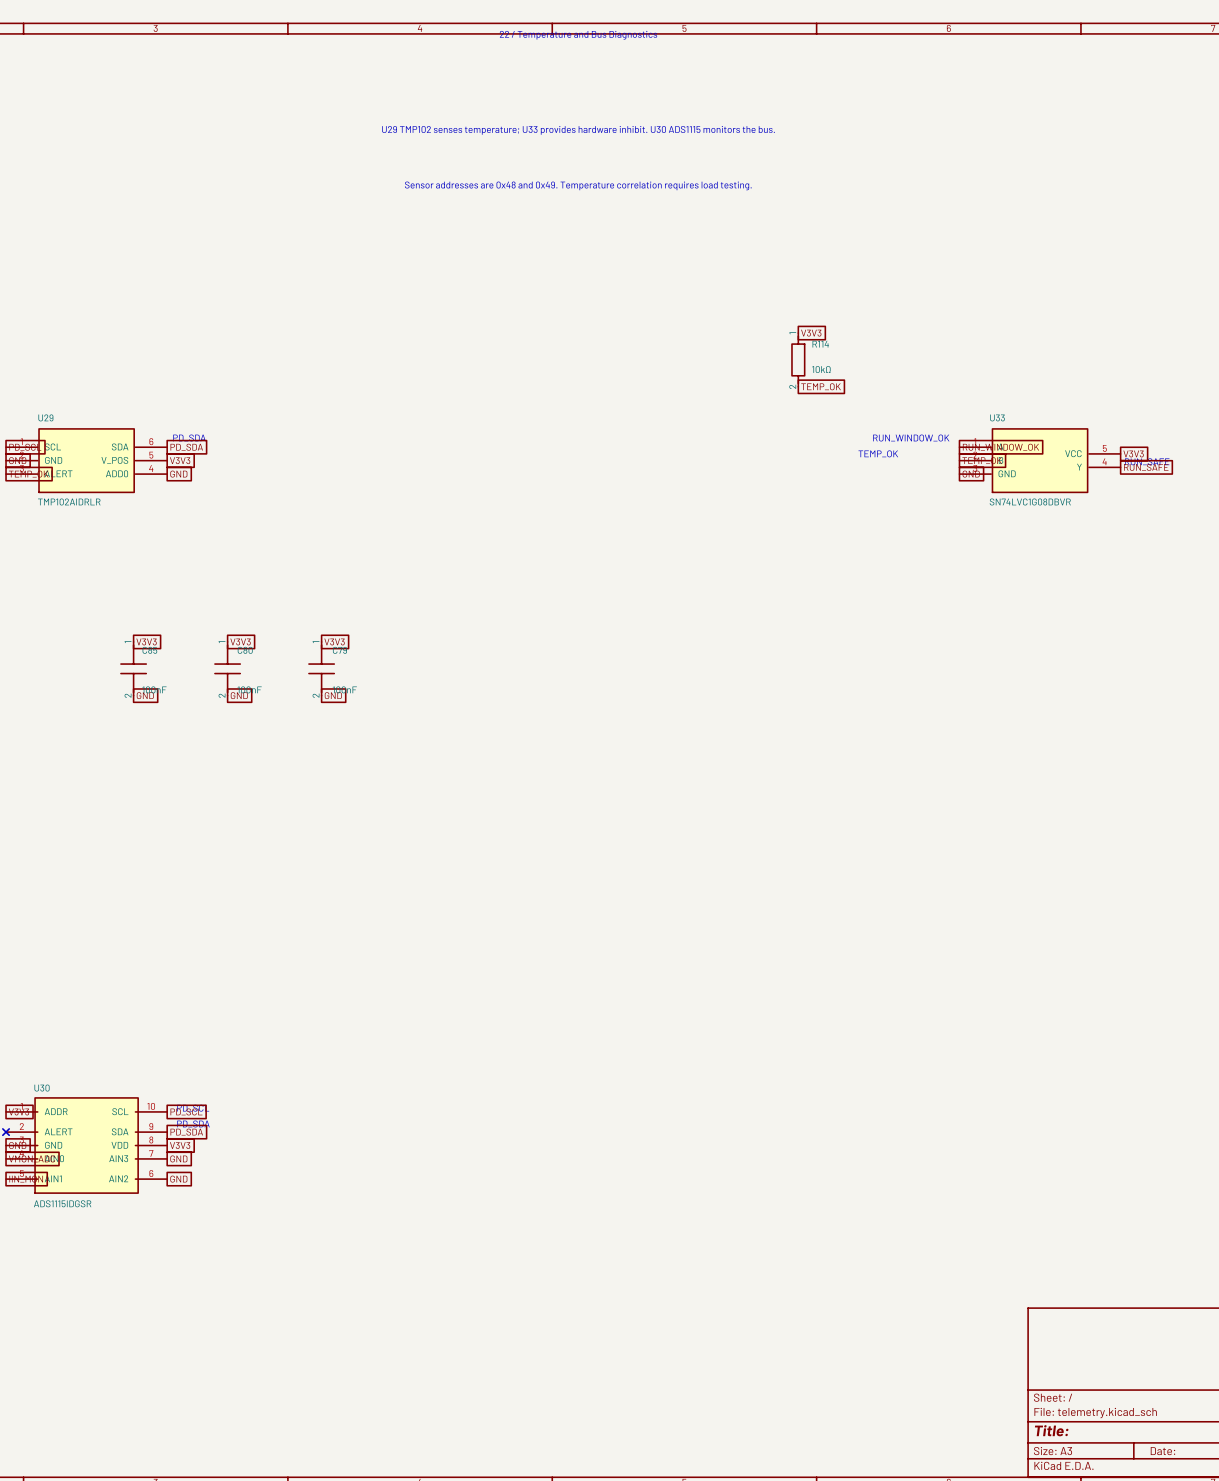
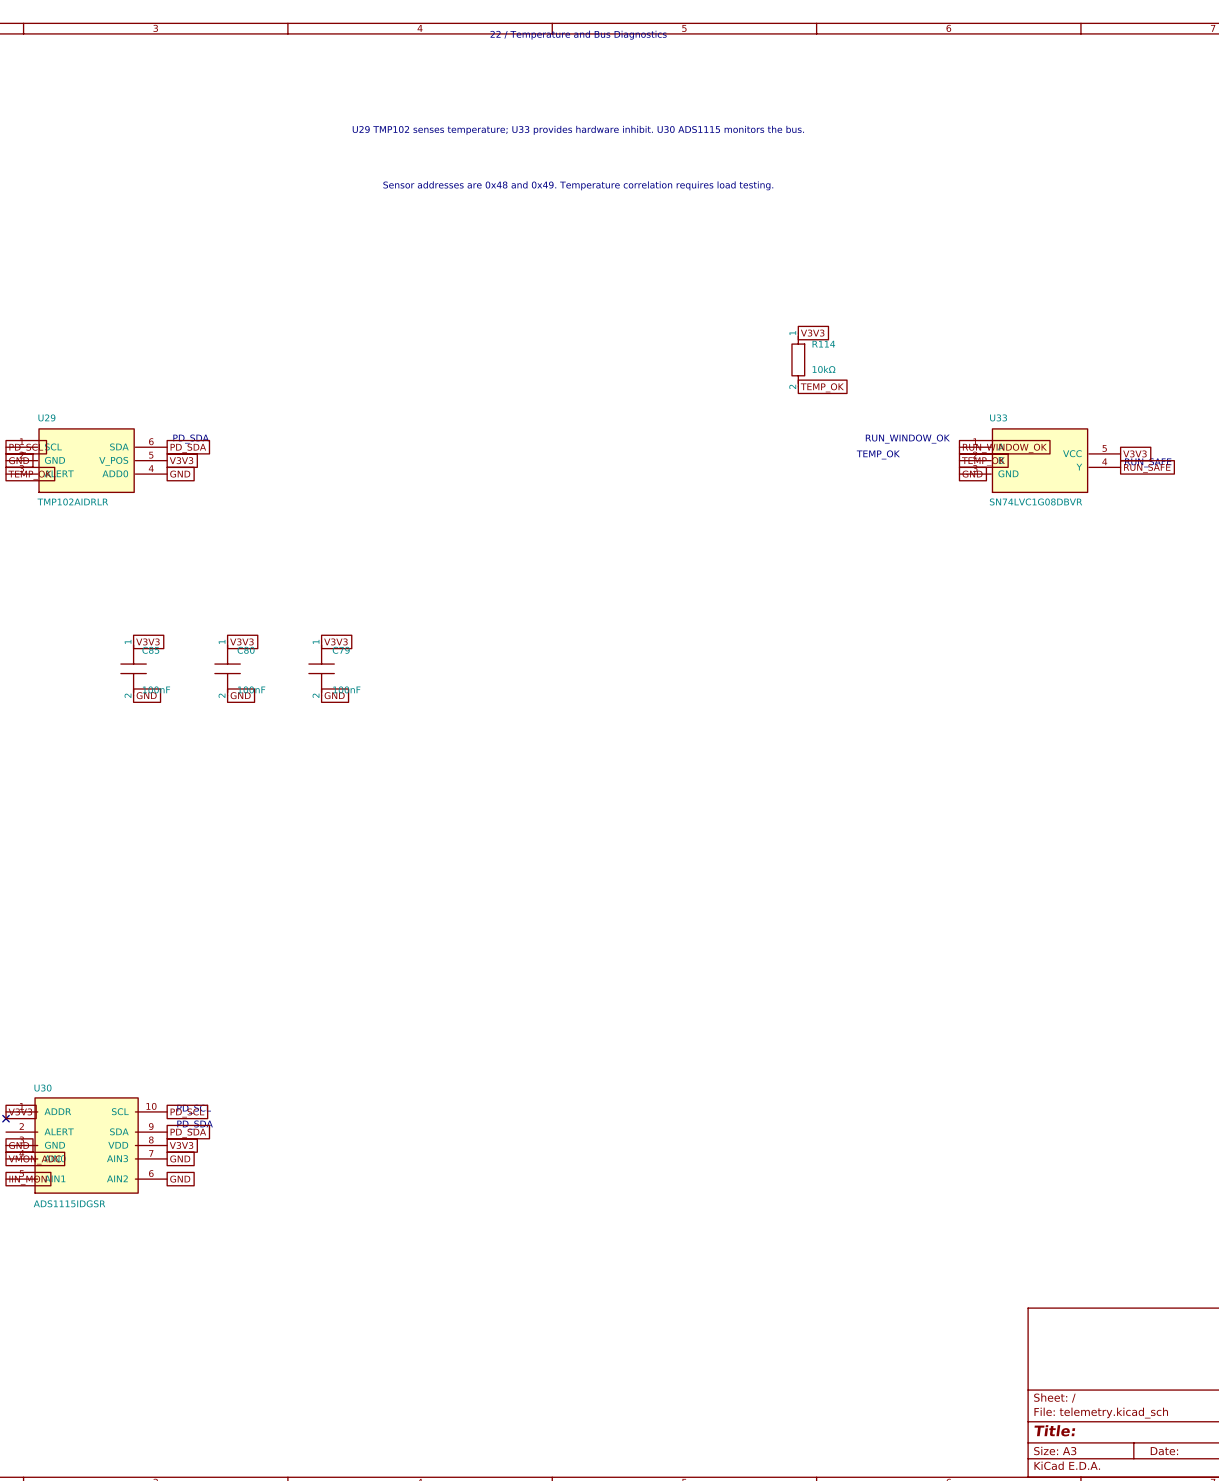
no-connect mark position: (6, 1132) -> (6, 1118)

